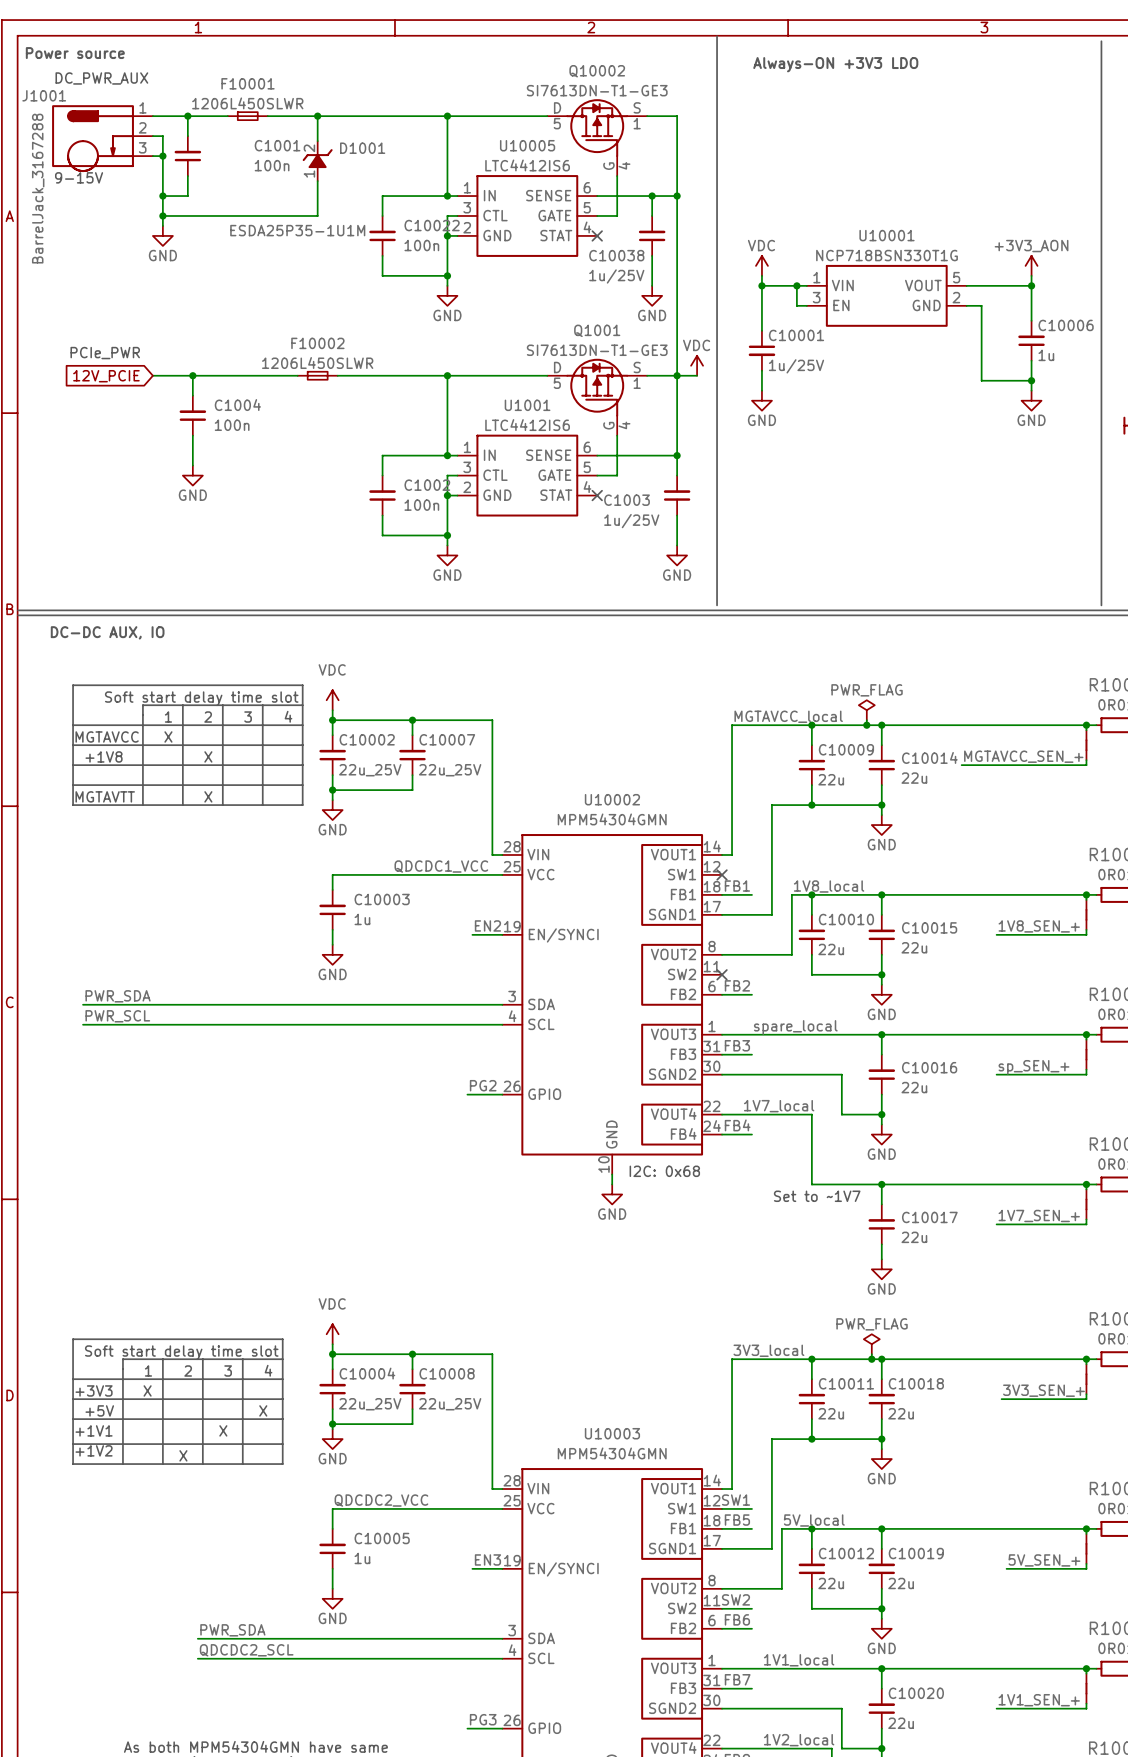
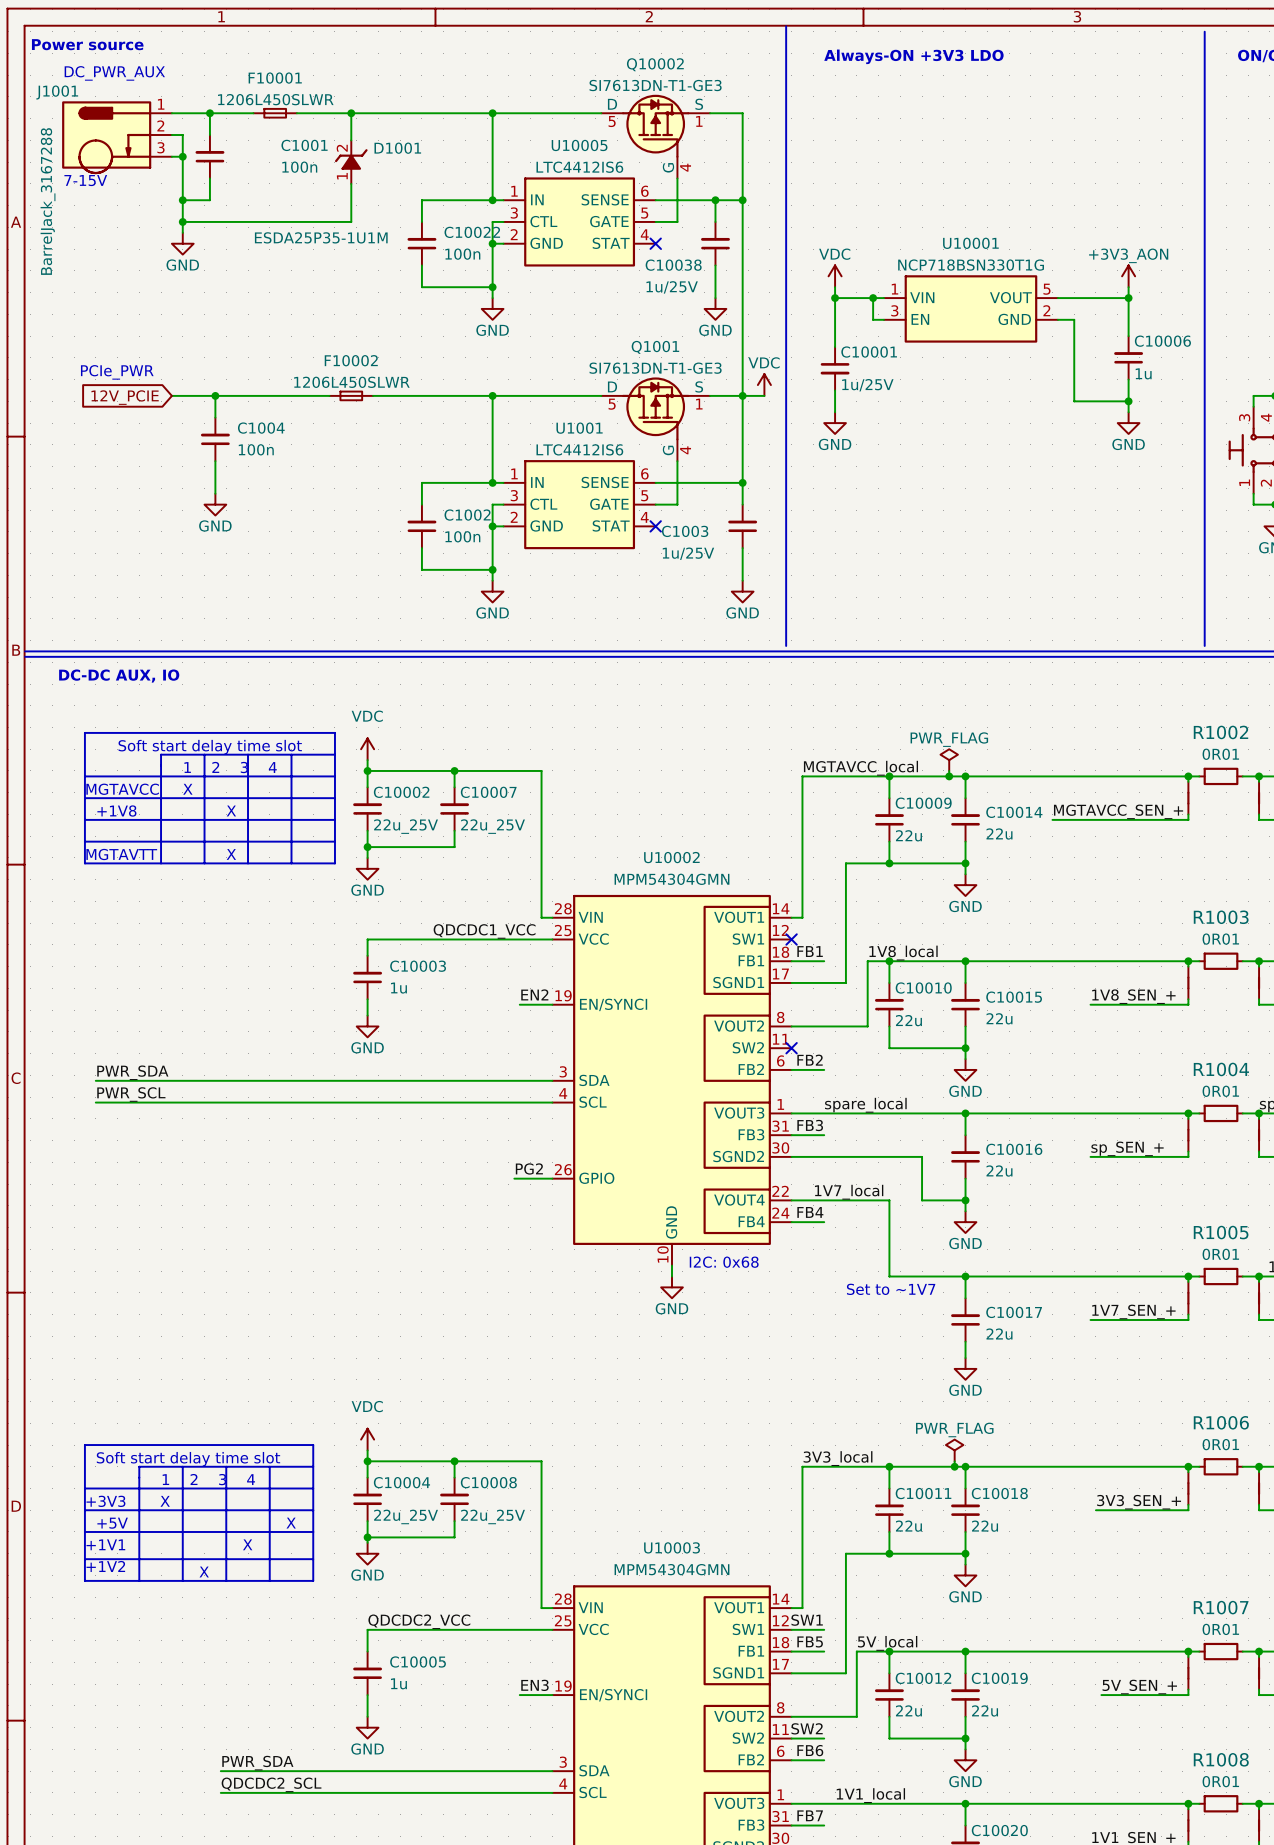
text: 9-15V (79, 177) -> 7-15V (85, 180)

